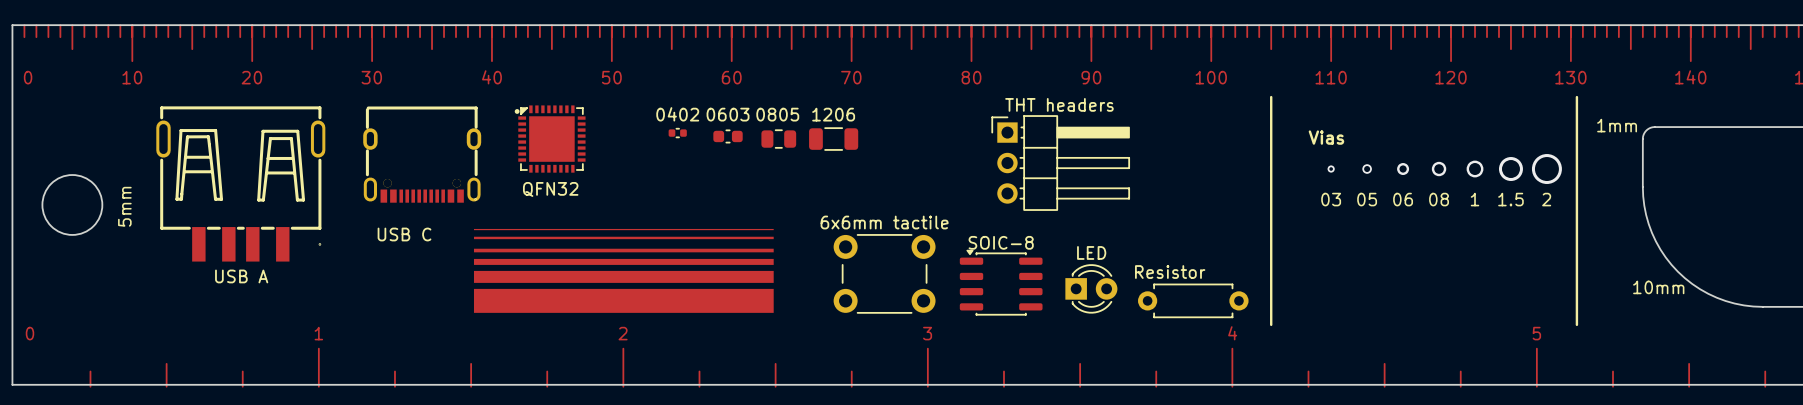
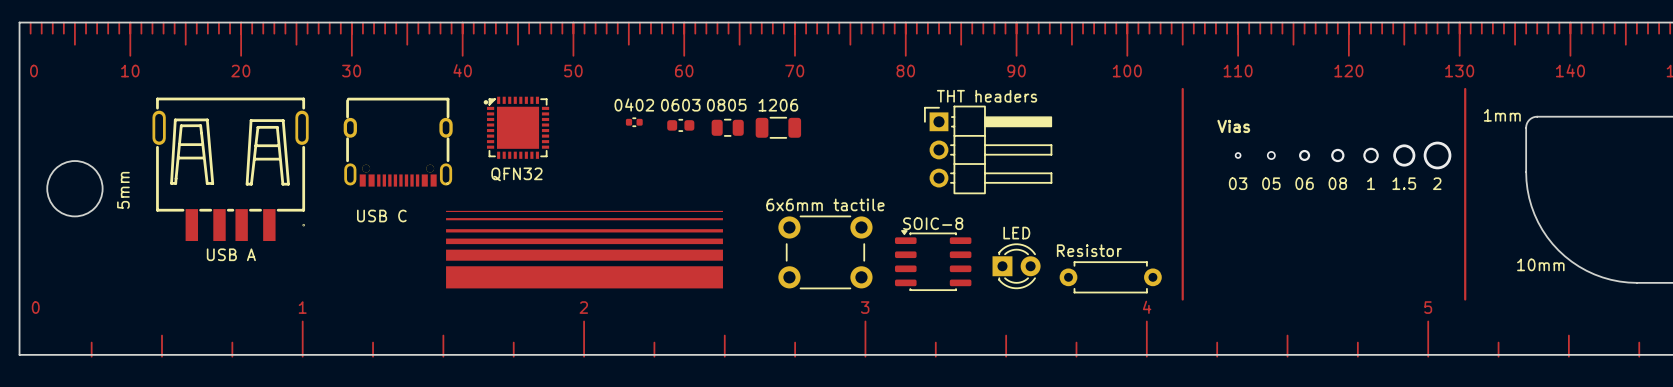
top track: none -> (1182, 89) (1182, 299)
line: (1271, 97) (1271, 324) -> none
top track: none -> (1465, 89) (1465, 299)
line: (1576, 97) (1576, 324) -> none

